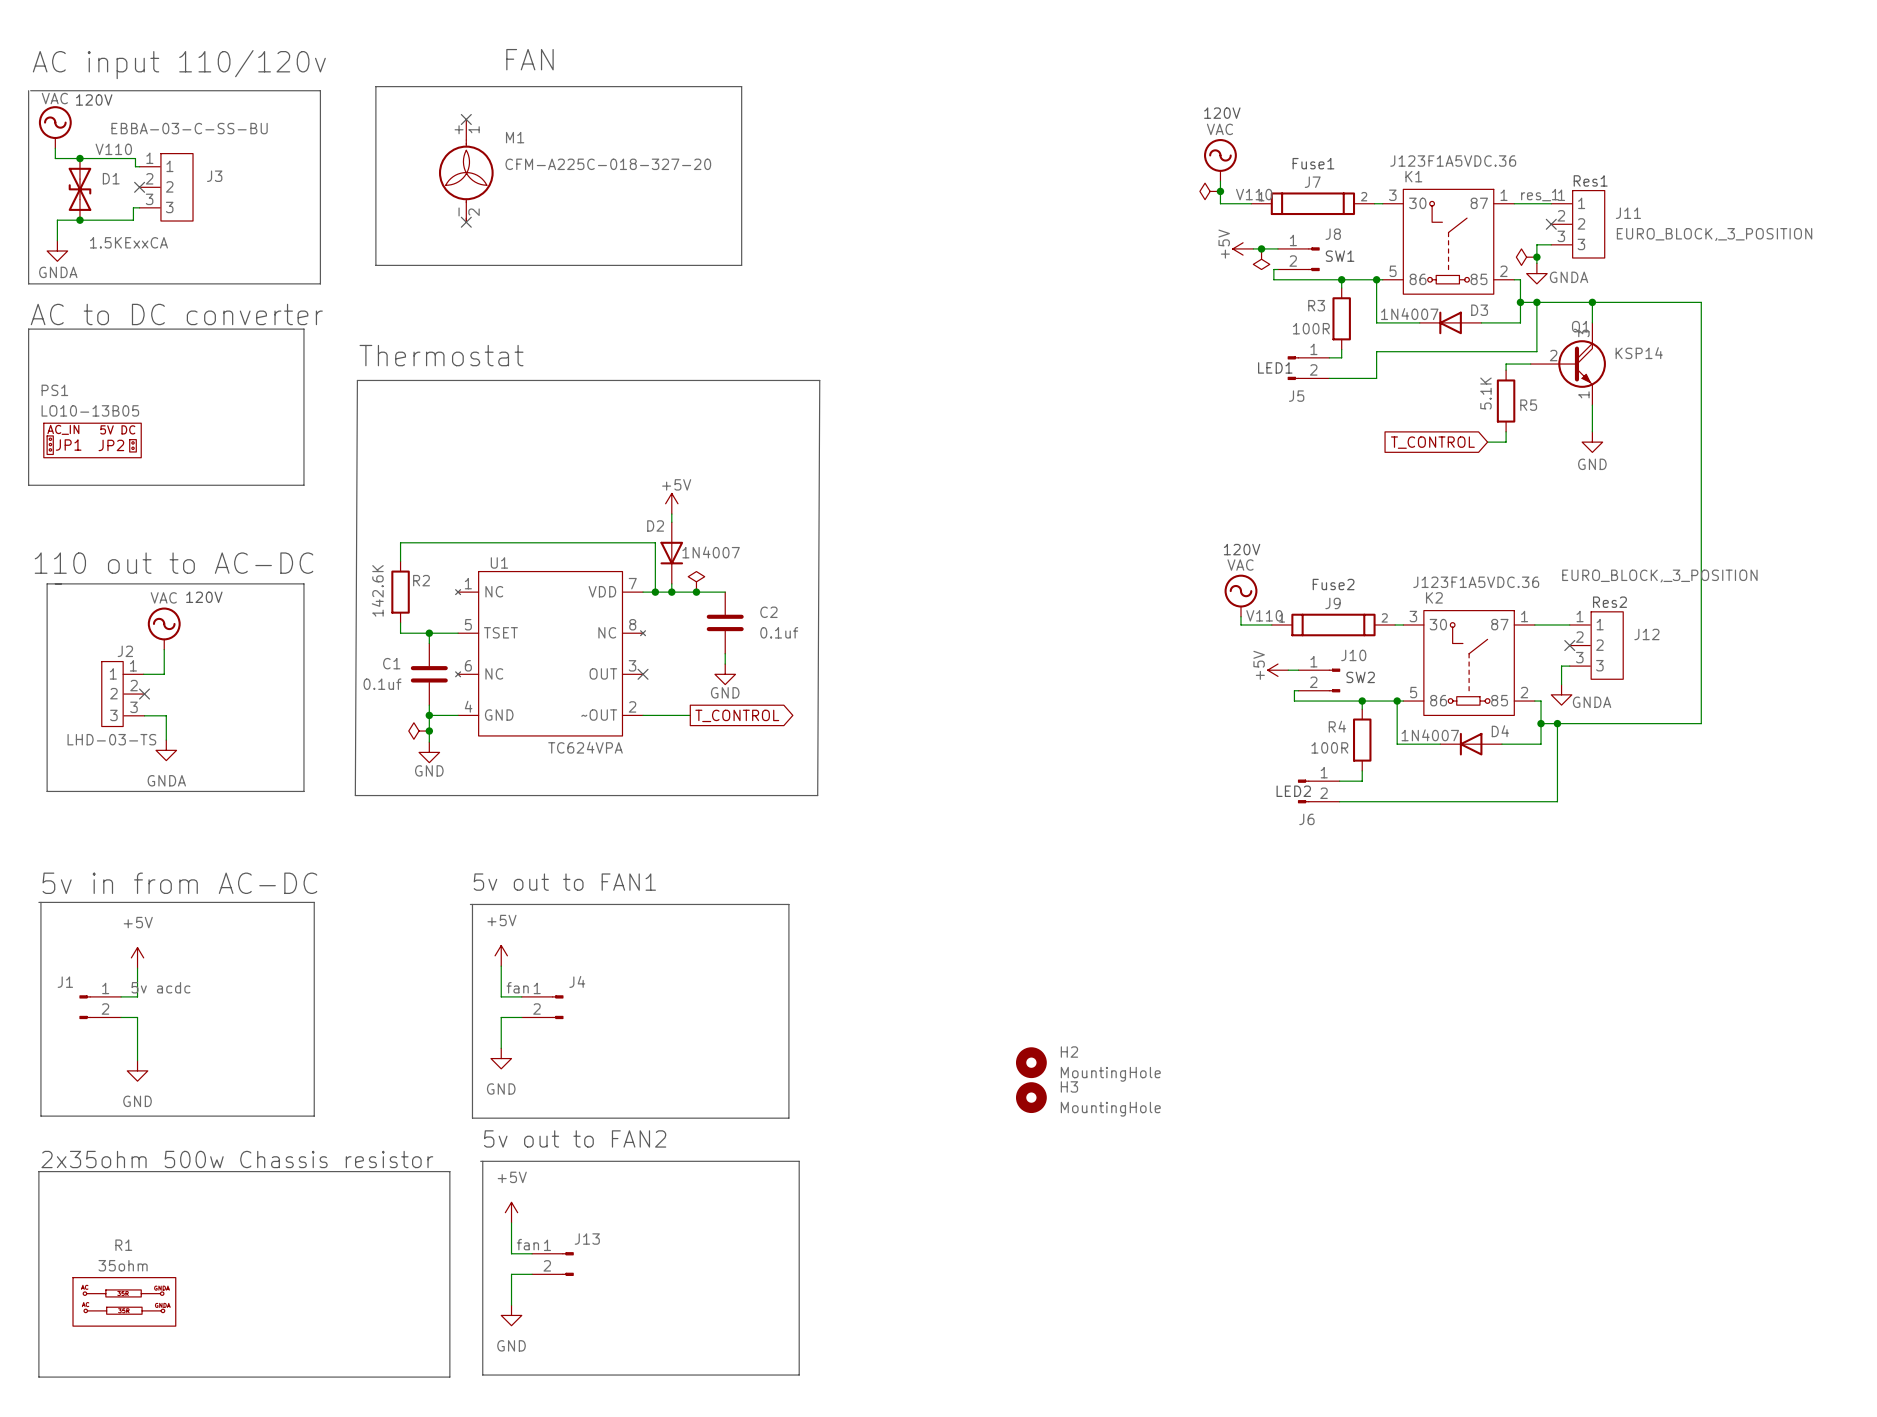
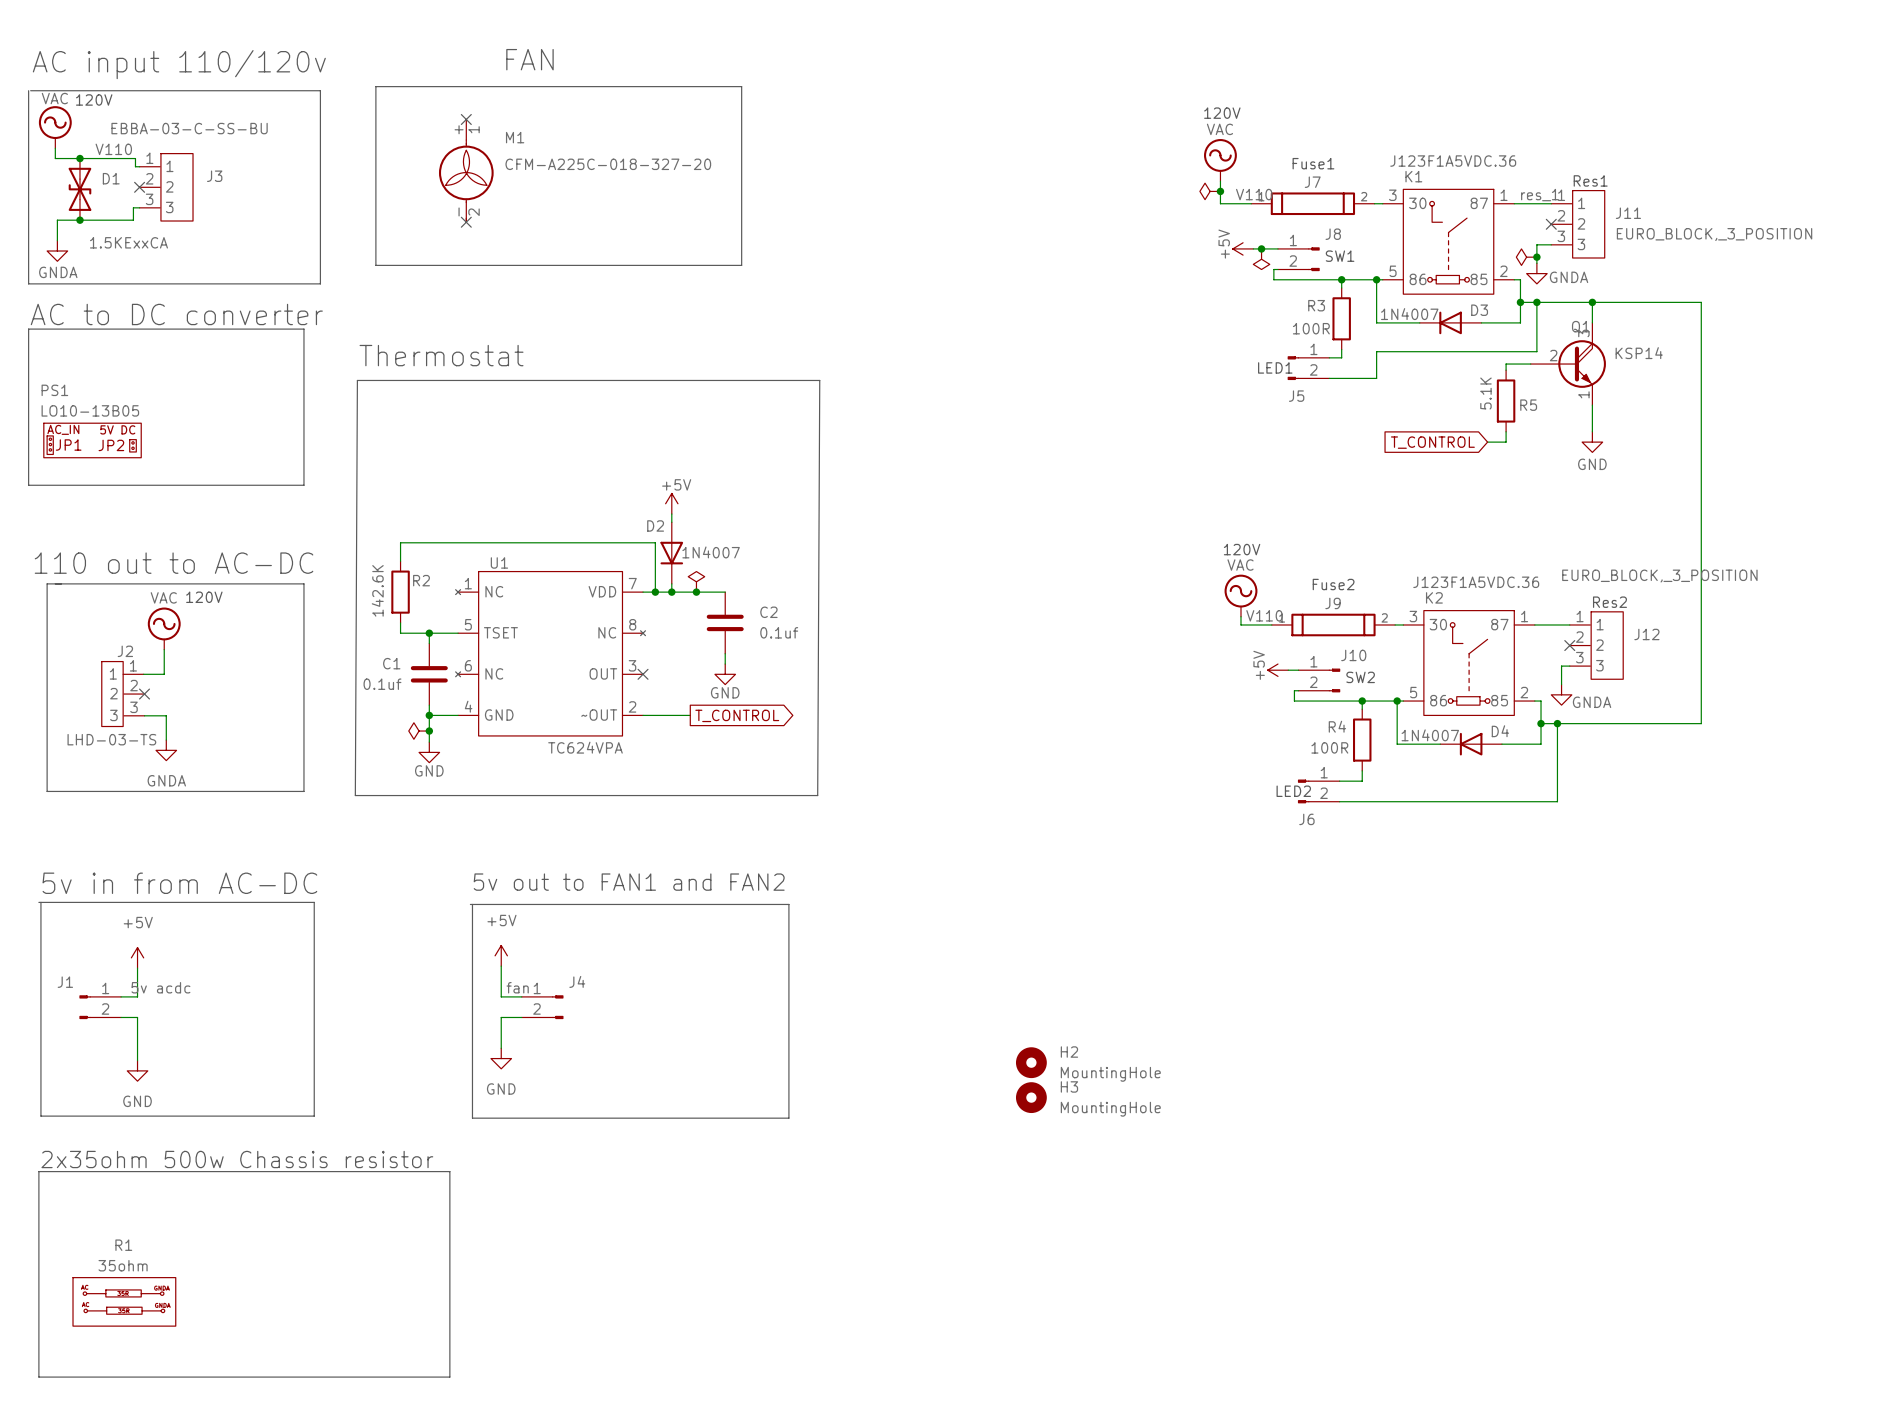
text: 5v out to FAN1 (564, 882) -> 5v out to FAN1 and FAN2 (629, 882)
text: 5v out to FAN2 (575, 1138) -> none
line: (480, 1161) (799, 1161) (799, 1375) (482, 1375) (482, 1161) -> none
power symbol: +5V (511, 1212) -> none
wire: (511, 1222) (511, 1253) (532, 1253) -> none
label: fan (527, 1244) -> none
J13: (552, 1264) -> none
wire: (532, 1274) (511, 1274) (511, 1305) -> none
power symbol: GND (511, 1315) -> none

